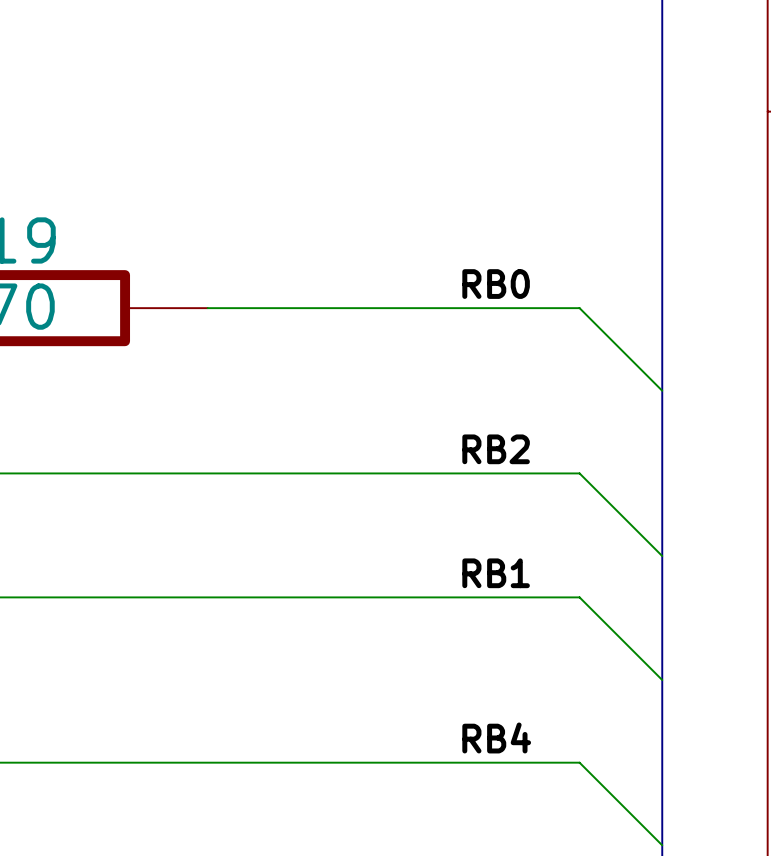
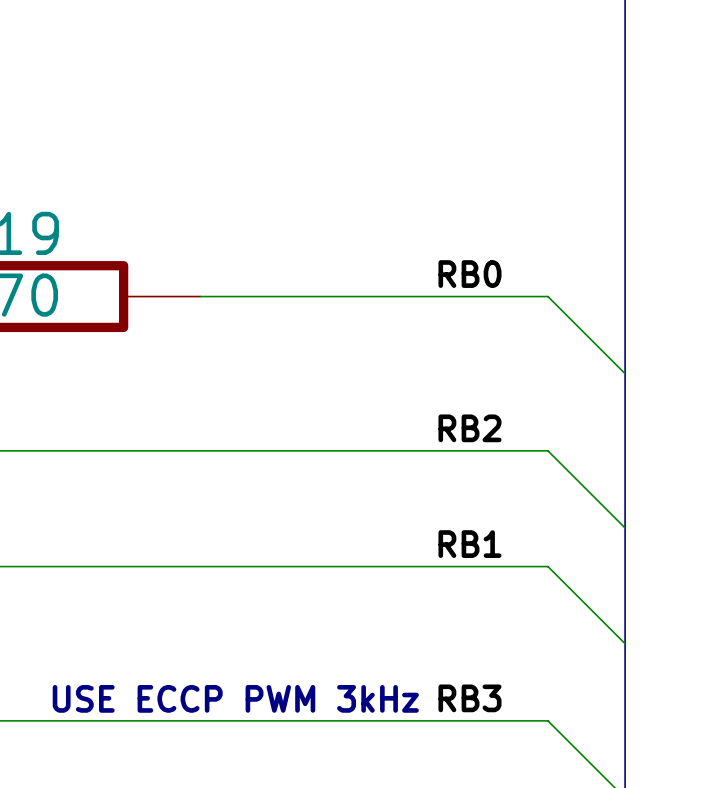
label: RB4 (496, 737) -> RB3 (469, 698)
text: none -> USE ECCP PWM 3kHz (235, 698)

